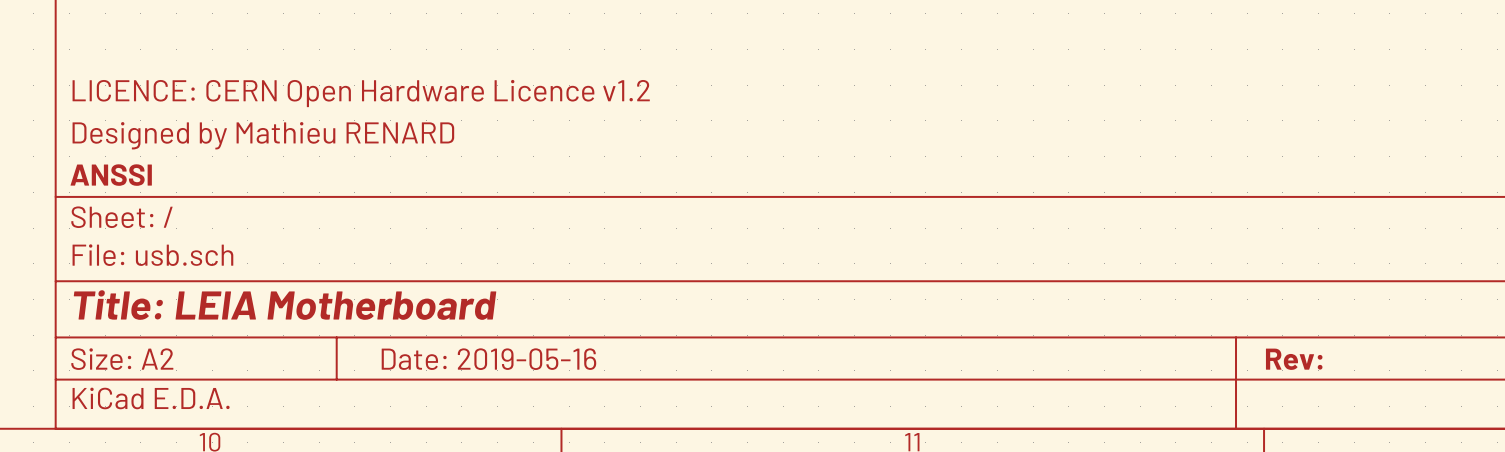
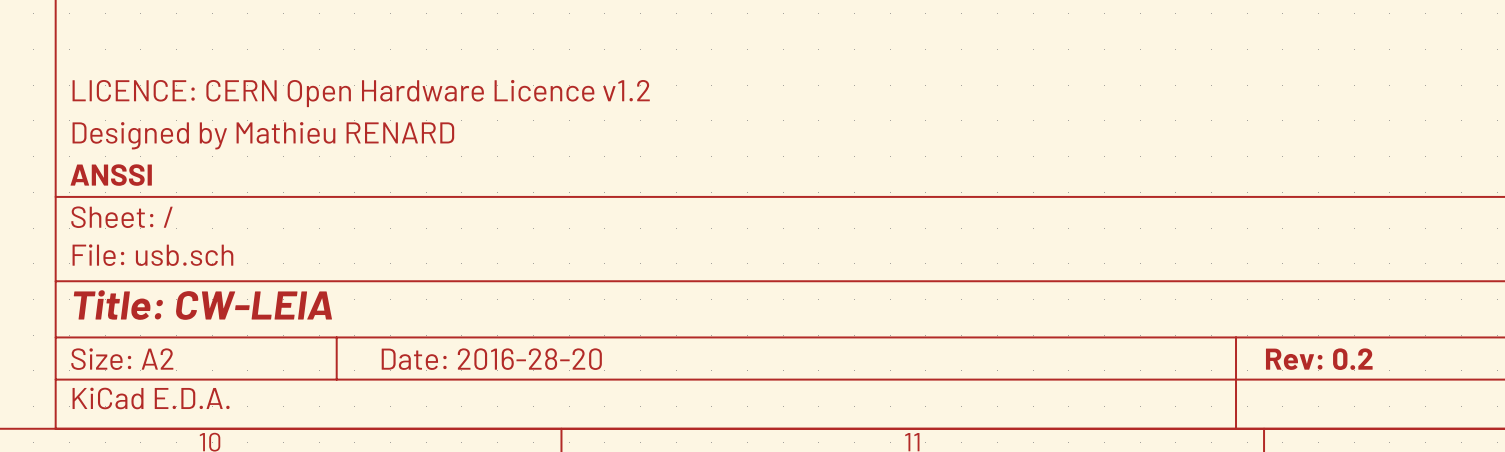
title block: Title: LEIA Motherboard (285, 305) -> Title: CW-LEIA (202, 305)
title block: Date: 2019-05-16 (488, 359) -> Date: 2016-28-20 (491, 359)
title block: Rev: (1294, 359) -> Rev: 0.2 (1319, 359)

